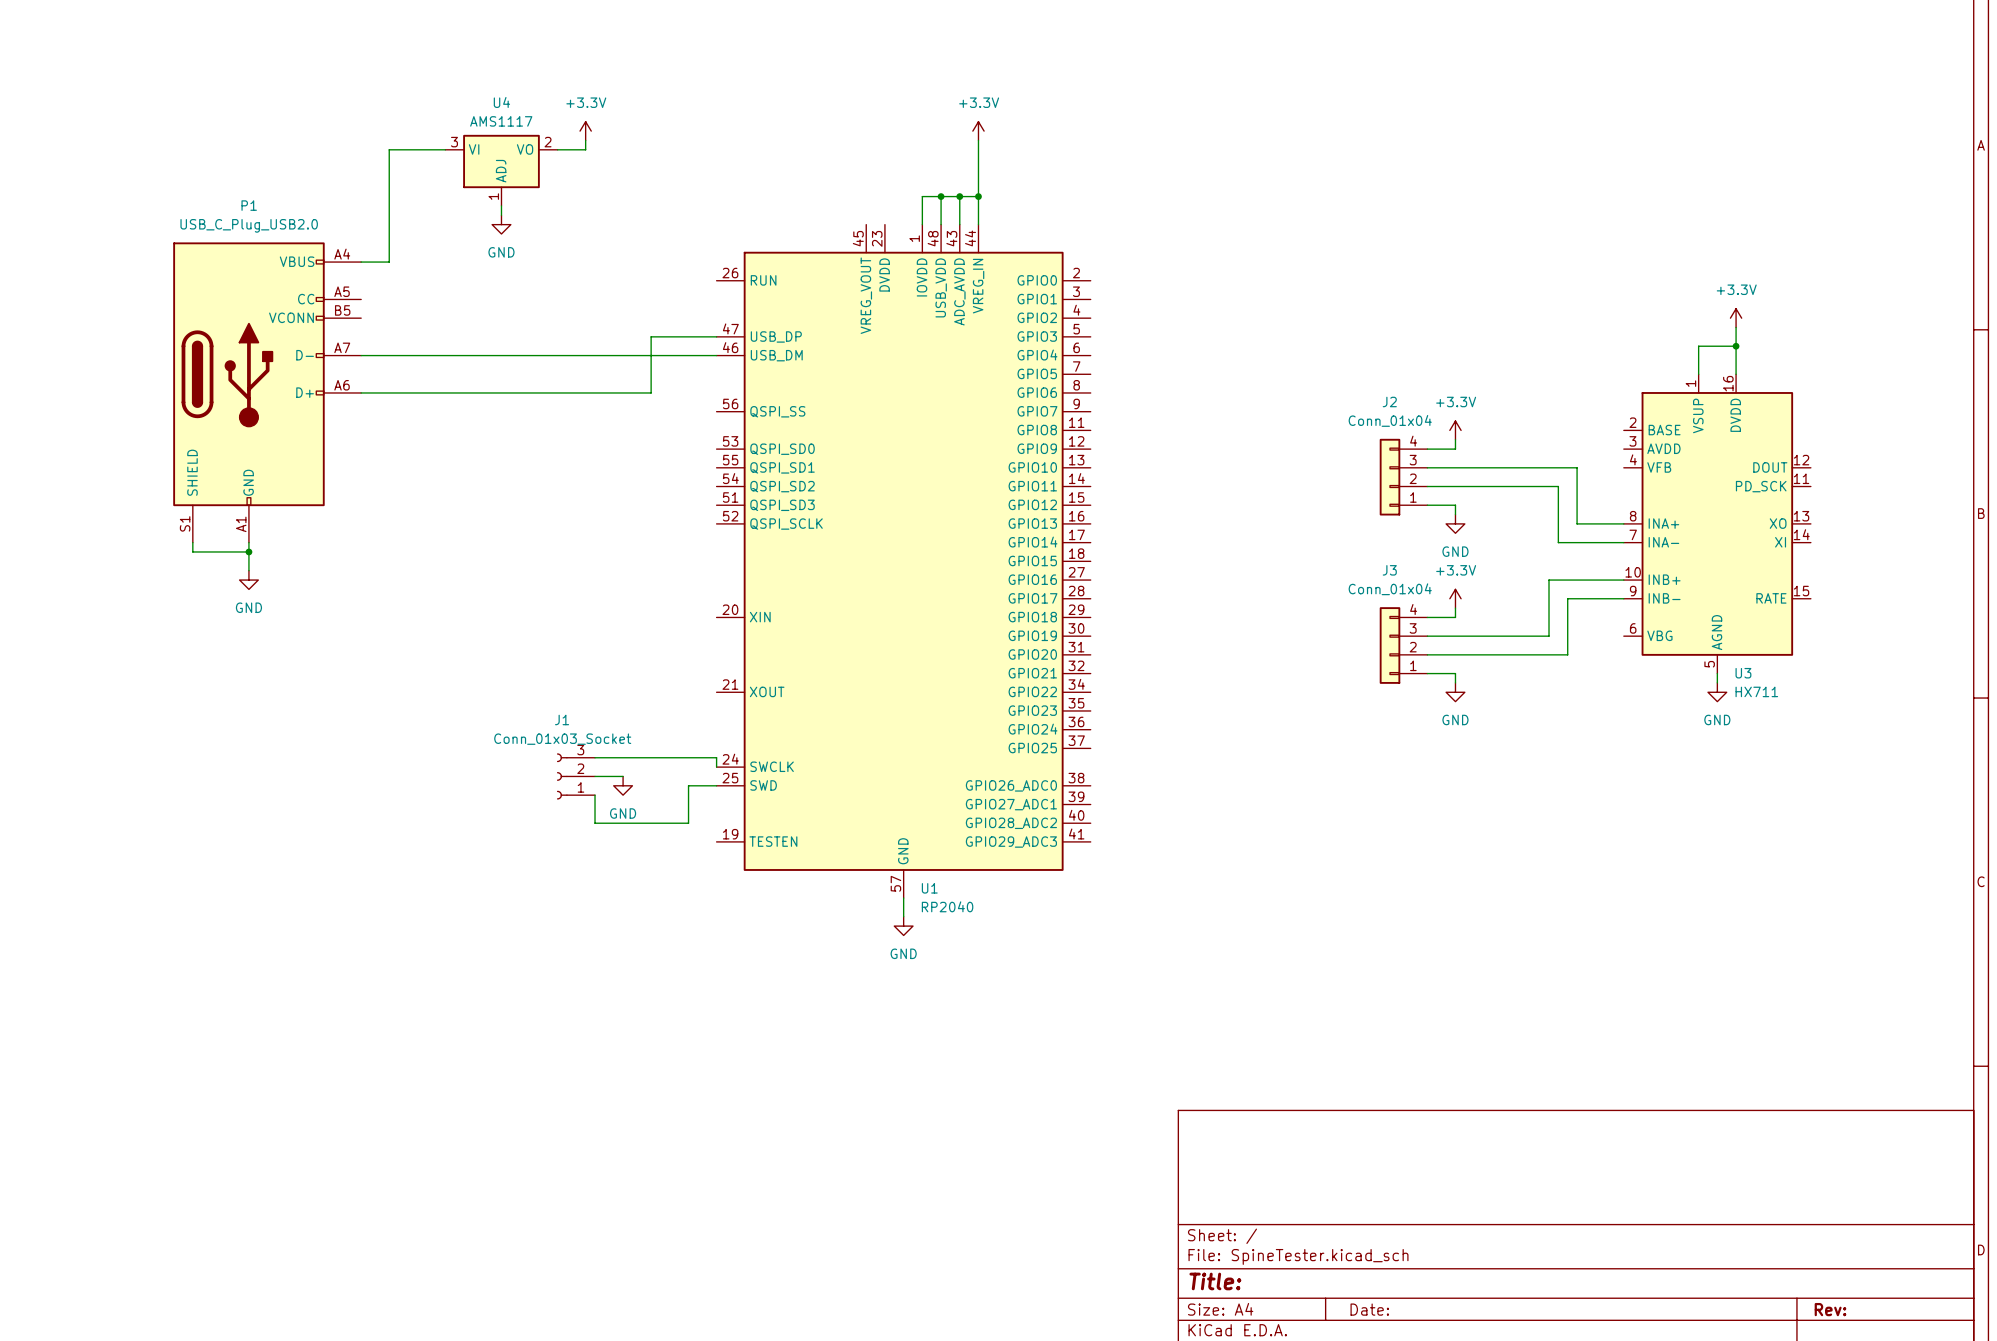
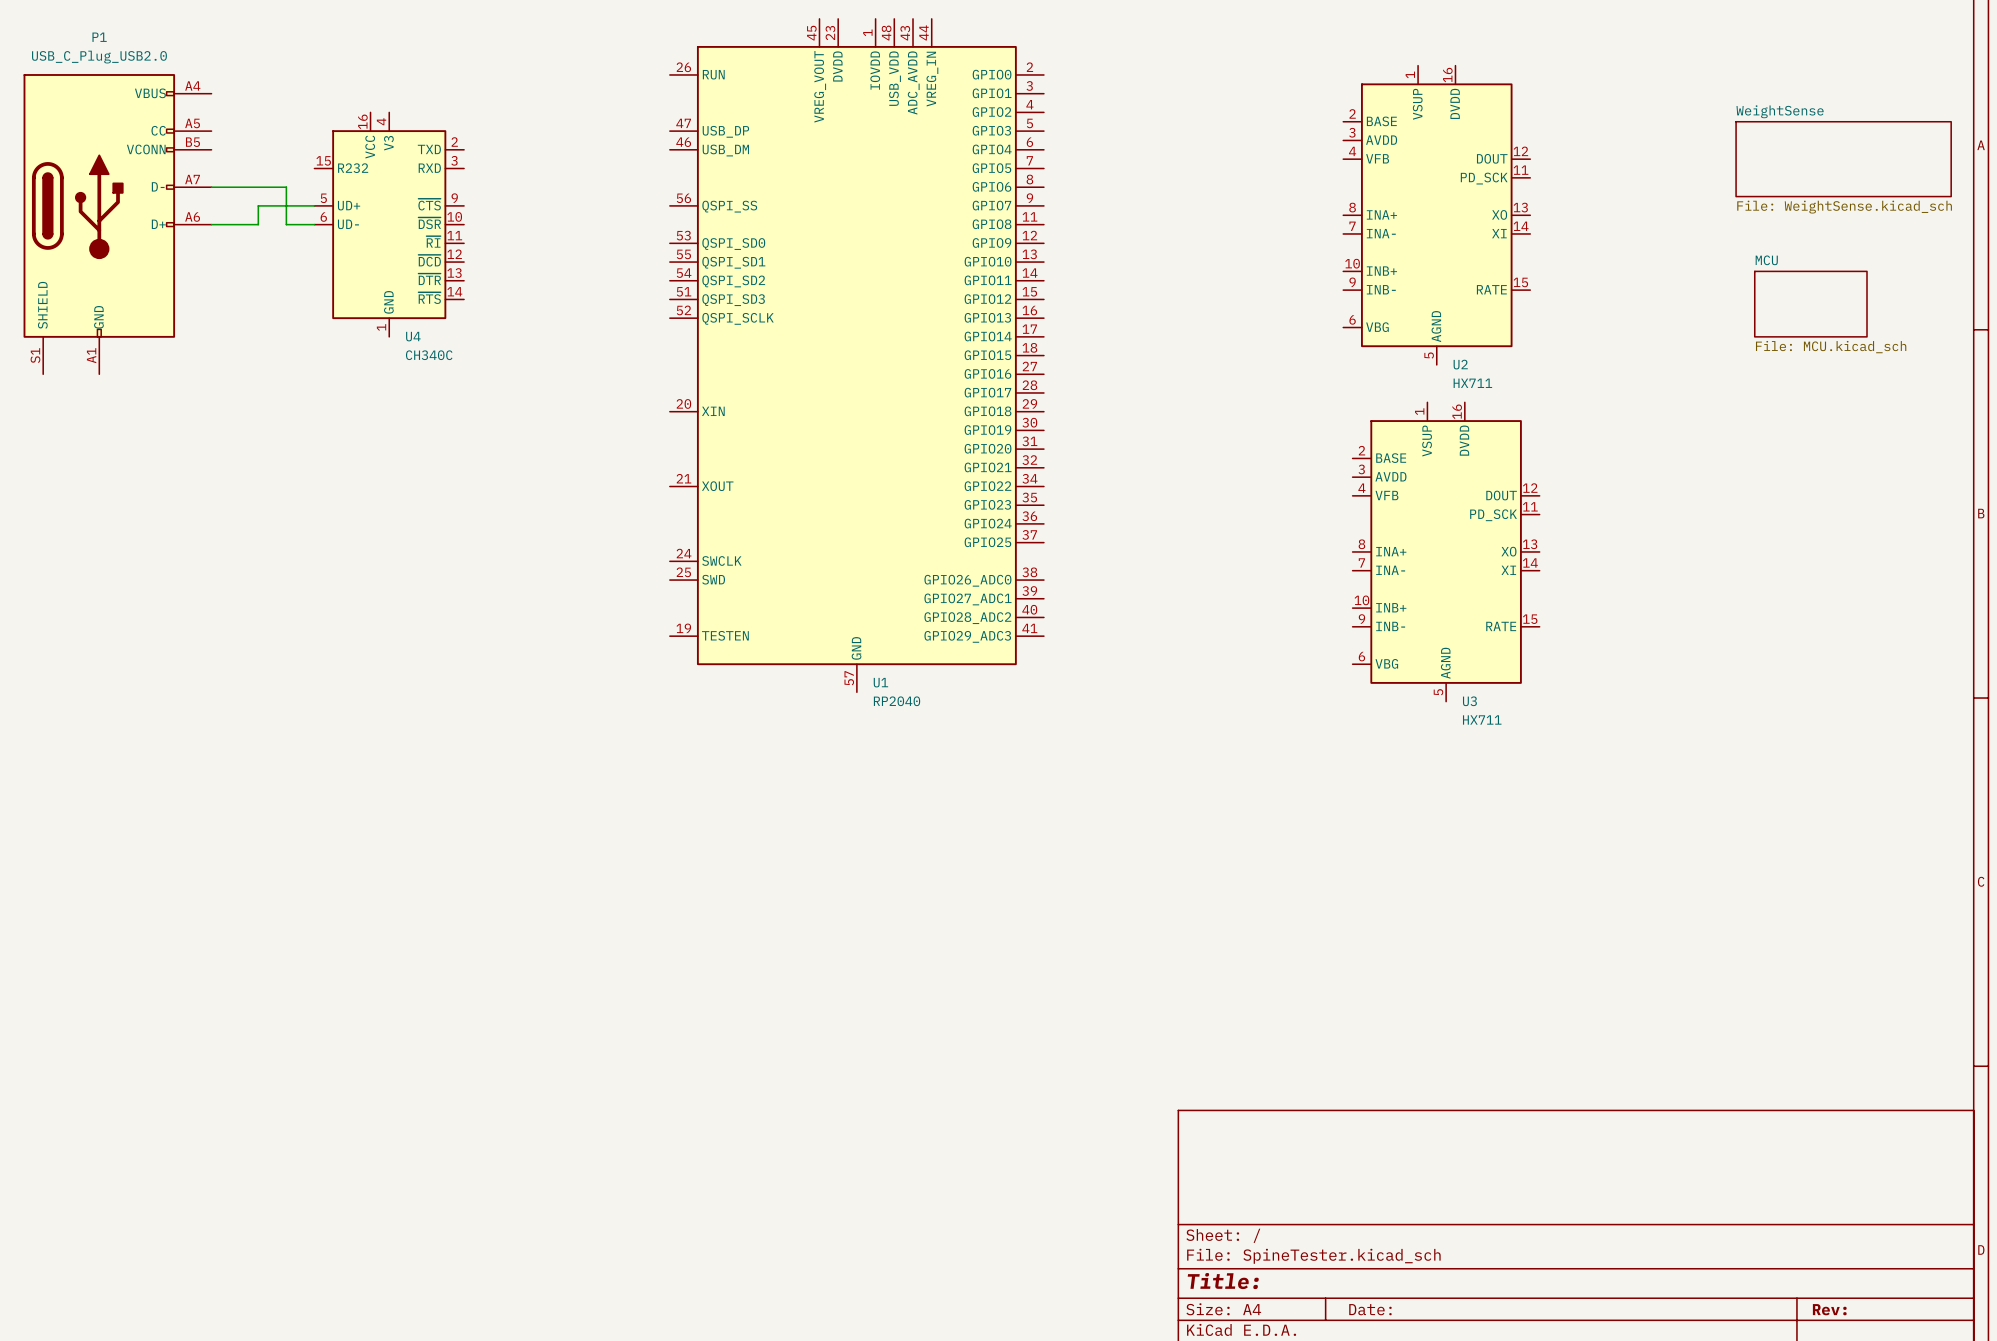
U4 name position: U4 (501, 102) -> U4 (413, 336)
U4 value: AMS1117 (501, 121) -> CH340C (429, 355)
power symbol: +3.3V (585, 131) -> none
power symbol: +3.3V (978, 131) -> none
U4 symbol: [445, 134, 558, 206] -> [314, 112, 465, 337]
wire: (585, 140) (585, 149) (557, 149) -> none
sheet WeightSense: none -> File: WeightSense.kicad_sch (1843, 159)
wire: none -> (211, 187) (286, 187) (286, 224) (314, 224)
junction: (941, 196) -> none
junction: (959, 196) -> none
junction: (978, 196) -> none
wire: none -> (314, 205) (258, 205) (258, 224) (211, 224)
wire: (501, 205) (501, 215) -> none
U2: none -> HX711 (1436, 215)
power symbol: GND (501, 224) -> none
sheet MCU: none -> File: MCU.kicad_sch (1810, 304)
power symbol: +3.3V (1736, 318) -> none
wire: (1736, 327) (1736, 374) -> none
wire: (716, 336) (651, 336) (651, 392) (361, 392) -> none
wire: (1736, 346) (1698, 346) (1698, 374) -> none
junction: (1736, 346) -> none
wire: (361, 355) (716, 355) -> none
P1 position: (267, 392) -> (117, 224)
power symbol: +3.3V (1455, 430) -> none
wire: (1427, 467) (1577, 467) (1577, 523) (1623, 523) -> none
J2: Conn_01x04 (1403, 477) -> none
wire: (1427, 486) (1558, 486) (1558, 542) (1623, 542) -> none
power symbol: GND (1455, 523) -> none
U3 position: (1717, 523) -> (1446, 551)
wire: (192, 542) (192, 551) (248, 551) -> none
wire: (248, 542) (248, 570) -> none
junction: (248, 551) -> none
U1 position: (903, 561) -> (856, 355)
power symbol: GND (248, 580) -> none
wire: (1623, 580) (1549, 580) (1549, 636) (1427, 636) -> none
power symbol: +3.3V (1455, 598) -> none
wire: (1623, 598) (1567, 598) (1567, 654) (1427, 654) -> none
J3: Conn_01x04 (1403, 645) -> none
wire: (1717, 673) (1717, 682) -> none
power symbol: GND (1455, 692) -> none
power symbol: GND (1717, 692) -> none
wire: (595, 757) (716, 757) (716, 767) -> none
J1: Conn_01x03_Socket (576, 776) -> none
wire: (595, 776) (623, 776) -> none
power symbol: GND (623, 785) -> none
wire: (716, 785) (688, 785) (688, 823) (595, 823) (595, 795) -> none
wire: (903, 898) (903, 916) -> none
power symbol: GND (903, 926) -> none

